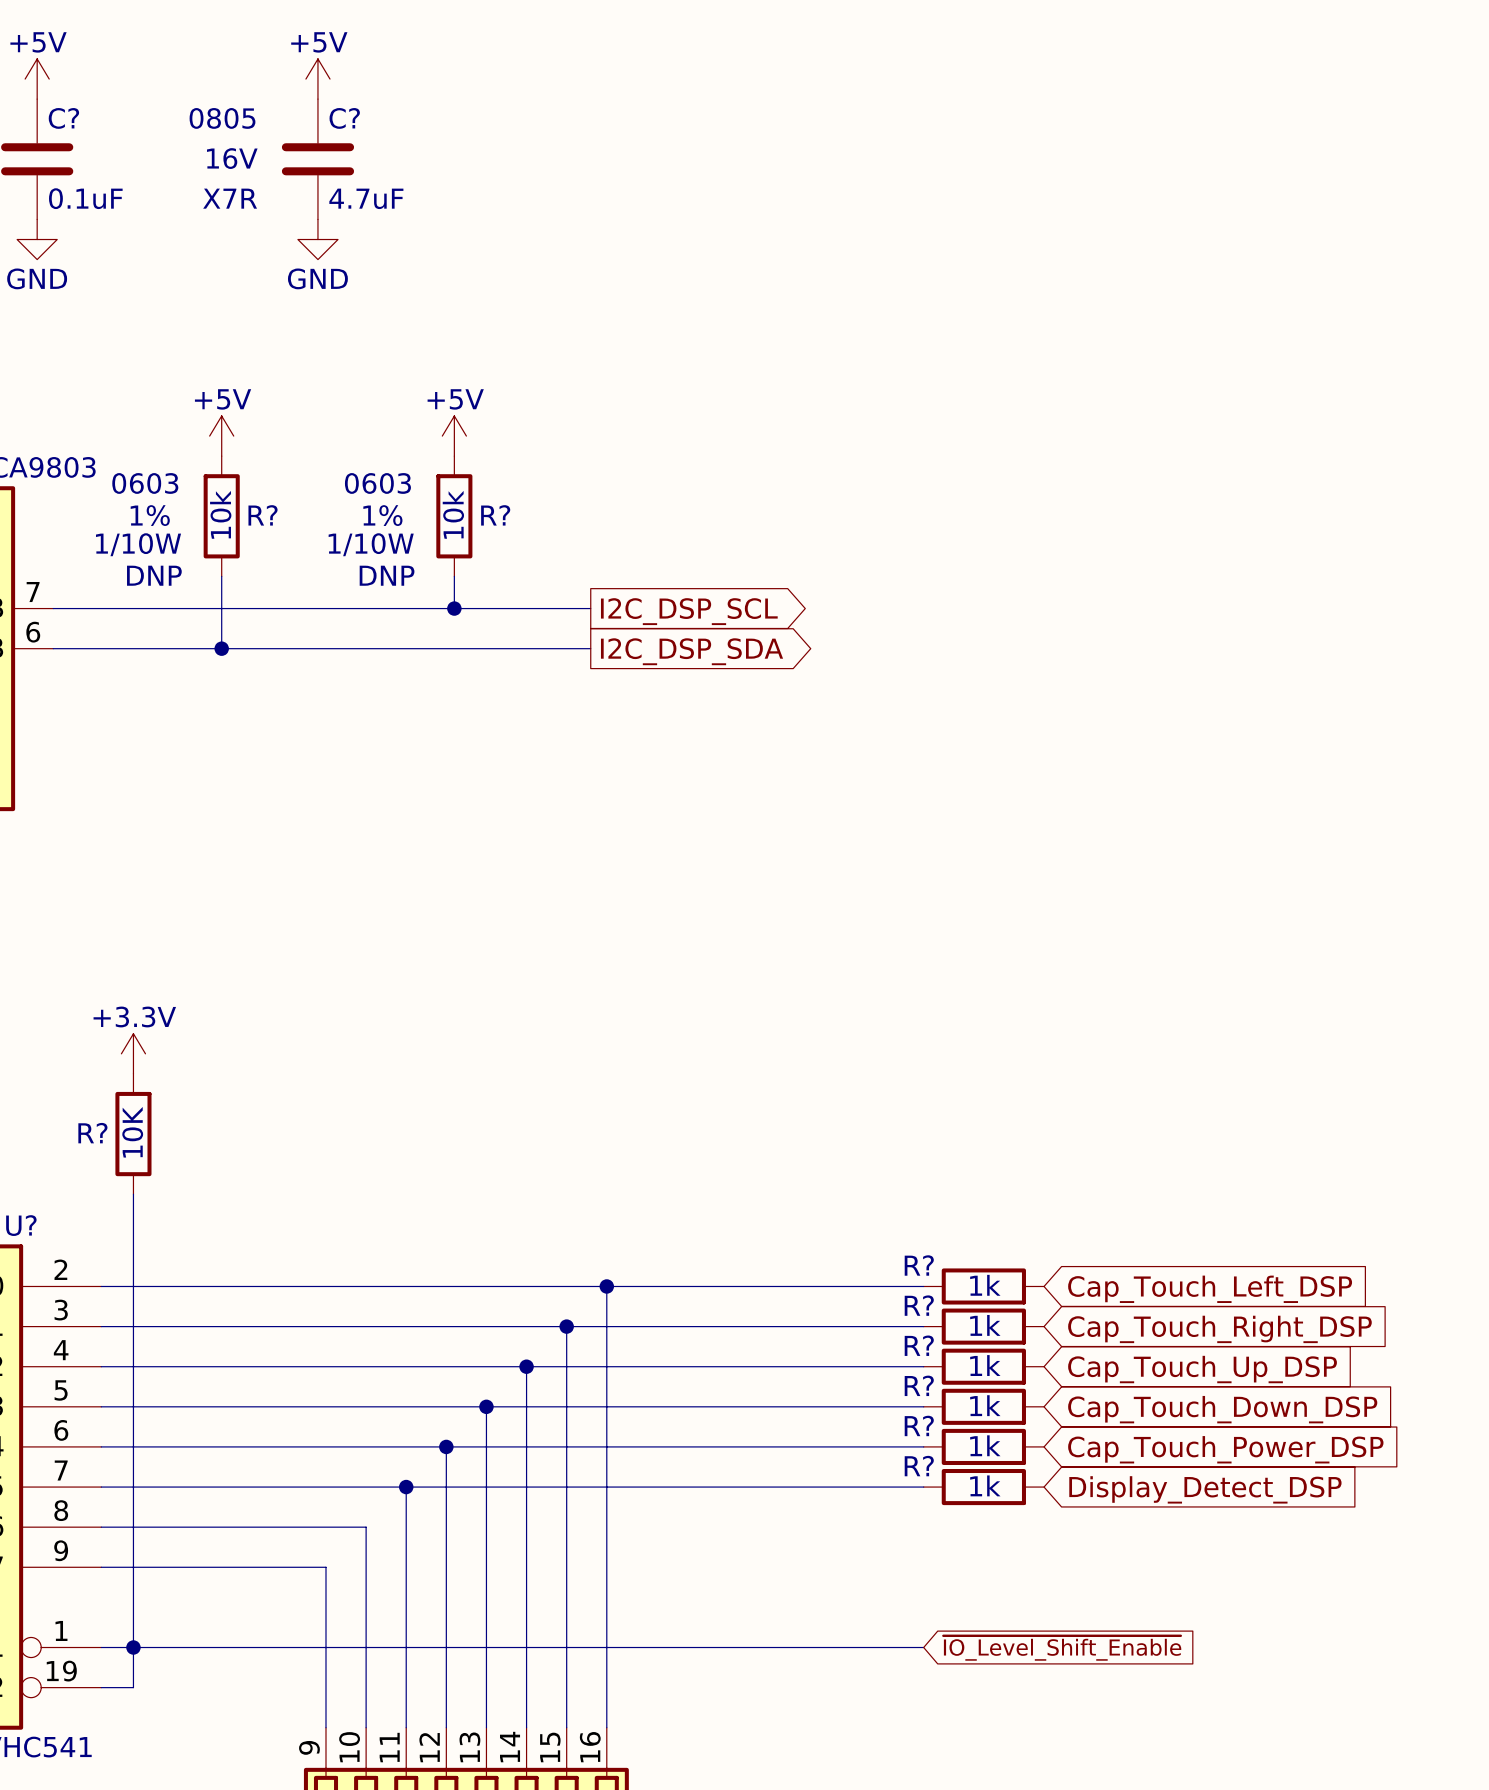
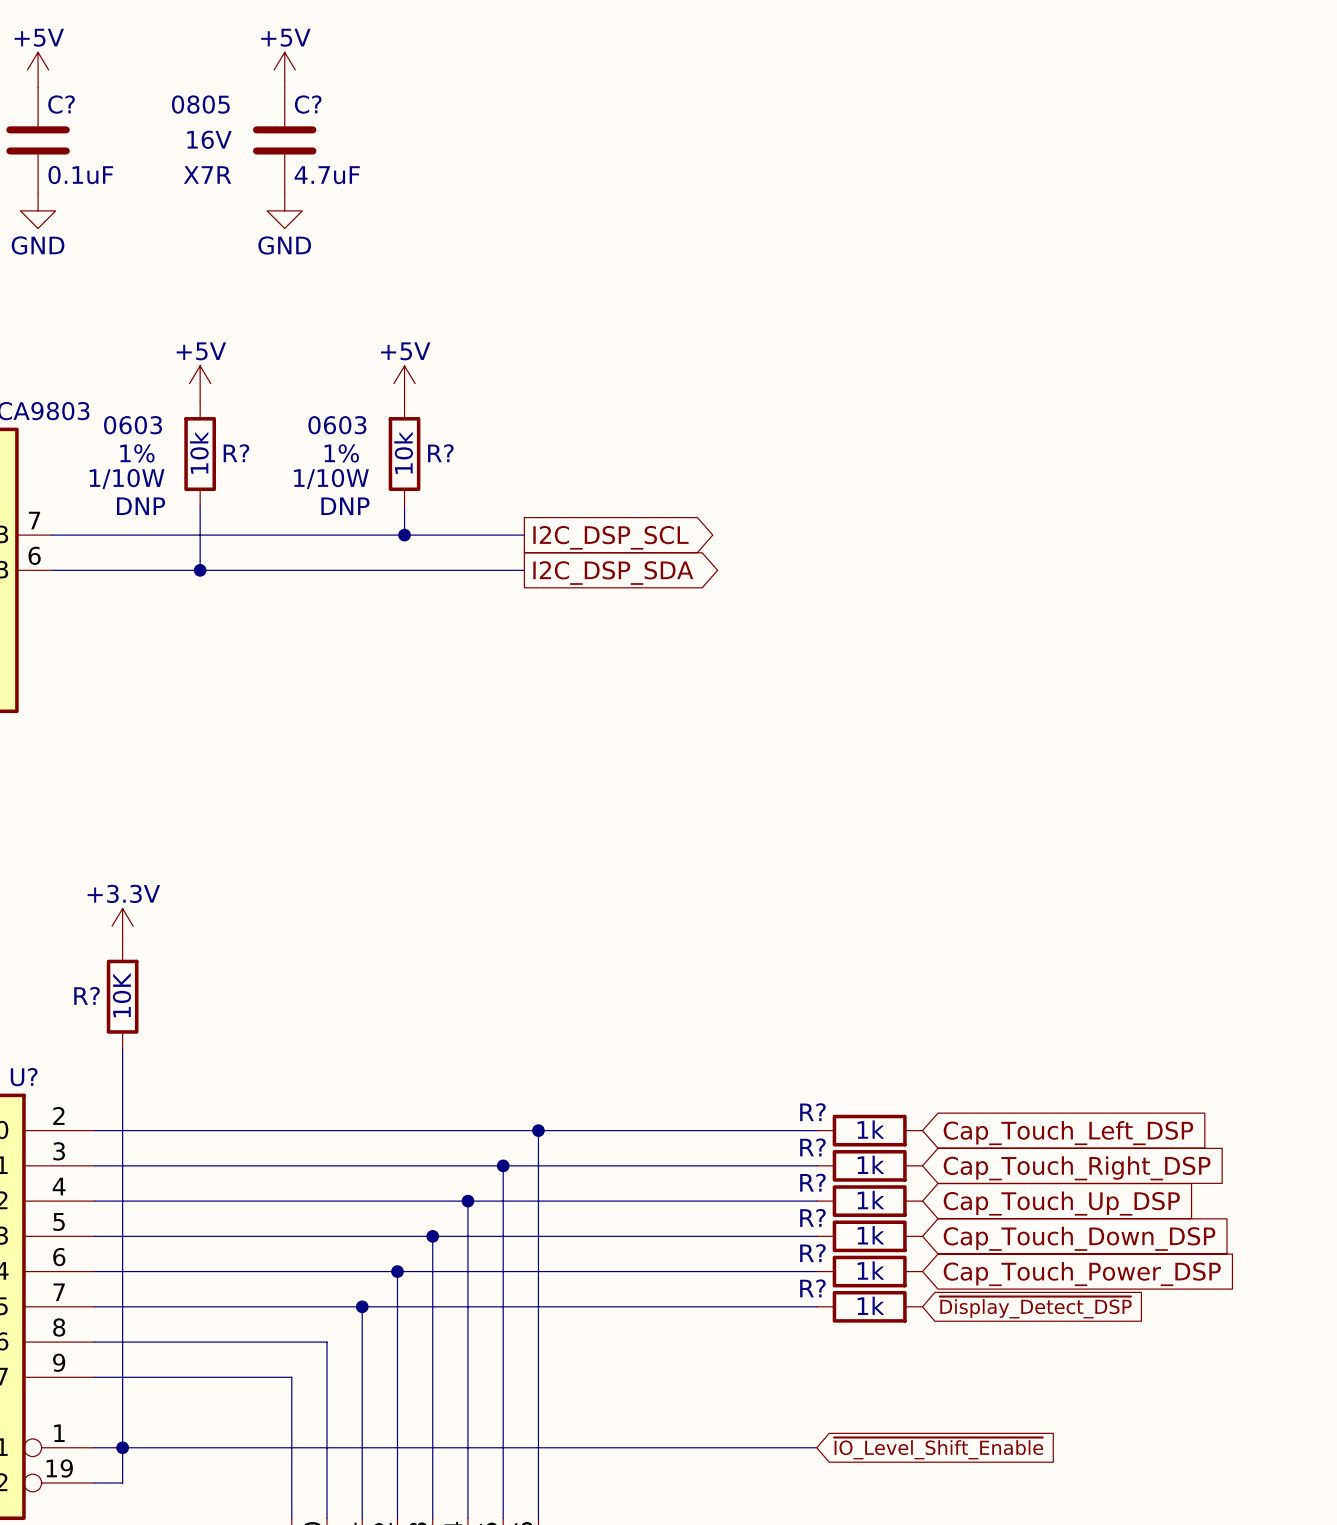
global label: Display_Detect_DSP (1205, 1489) -> ~{Display_Detect_DSP} (1035, 1307)

